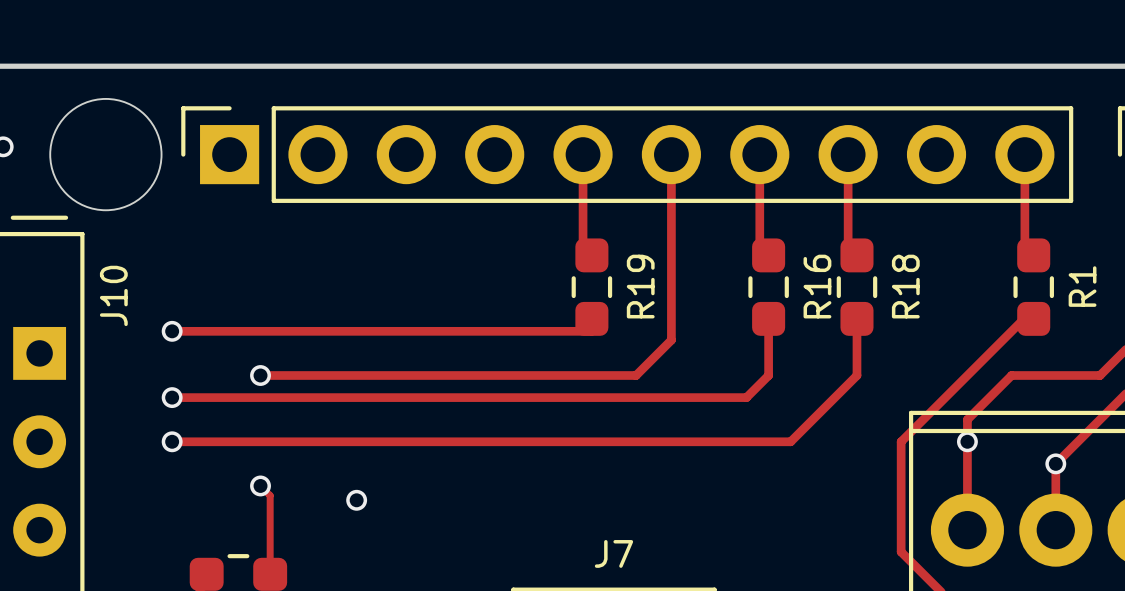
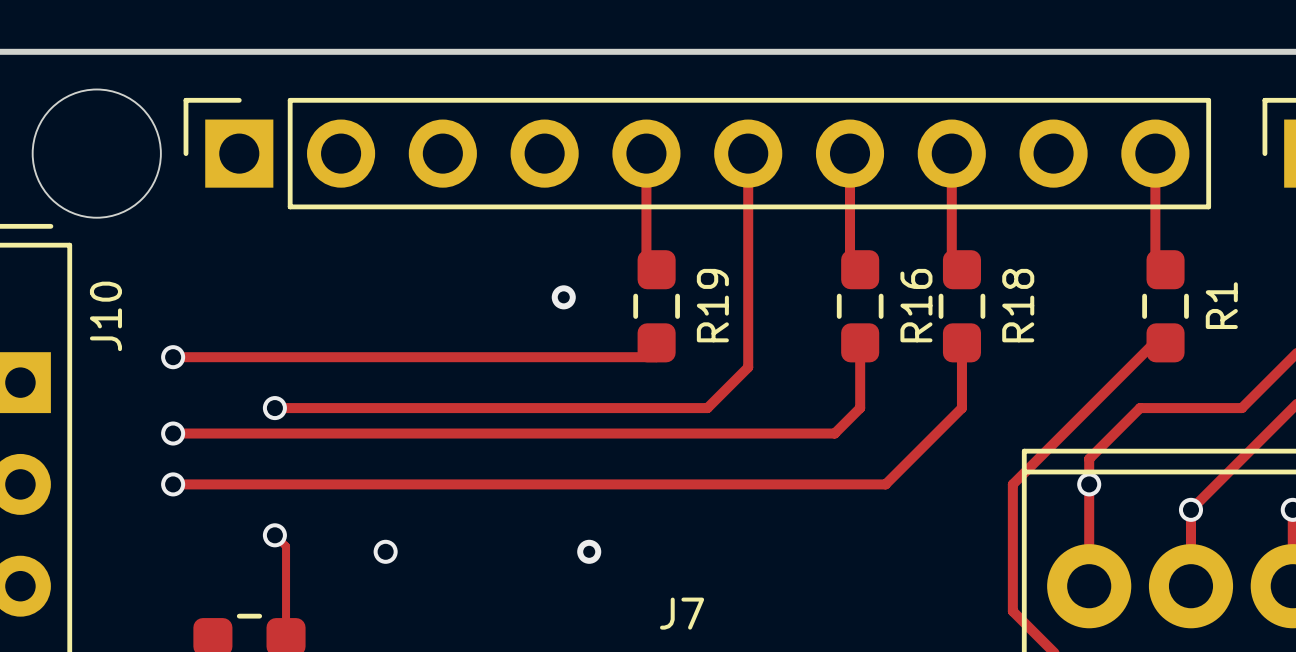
via: none -> (563, 297)
via: none -> (589, 551)

